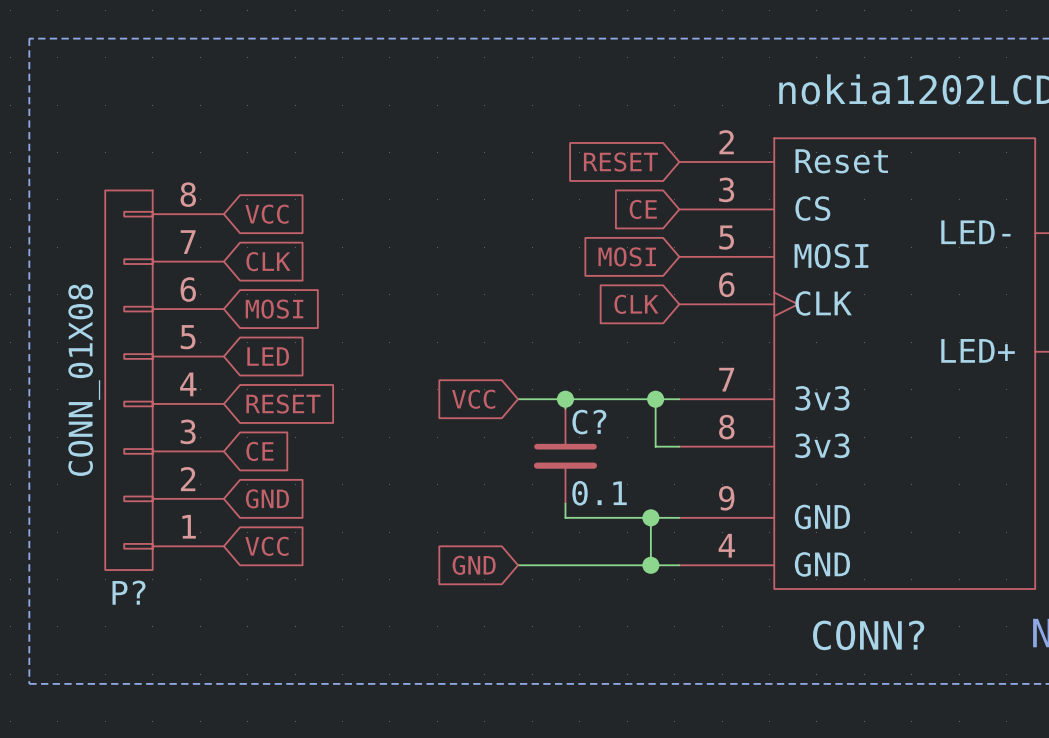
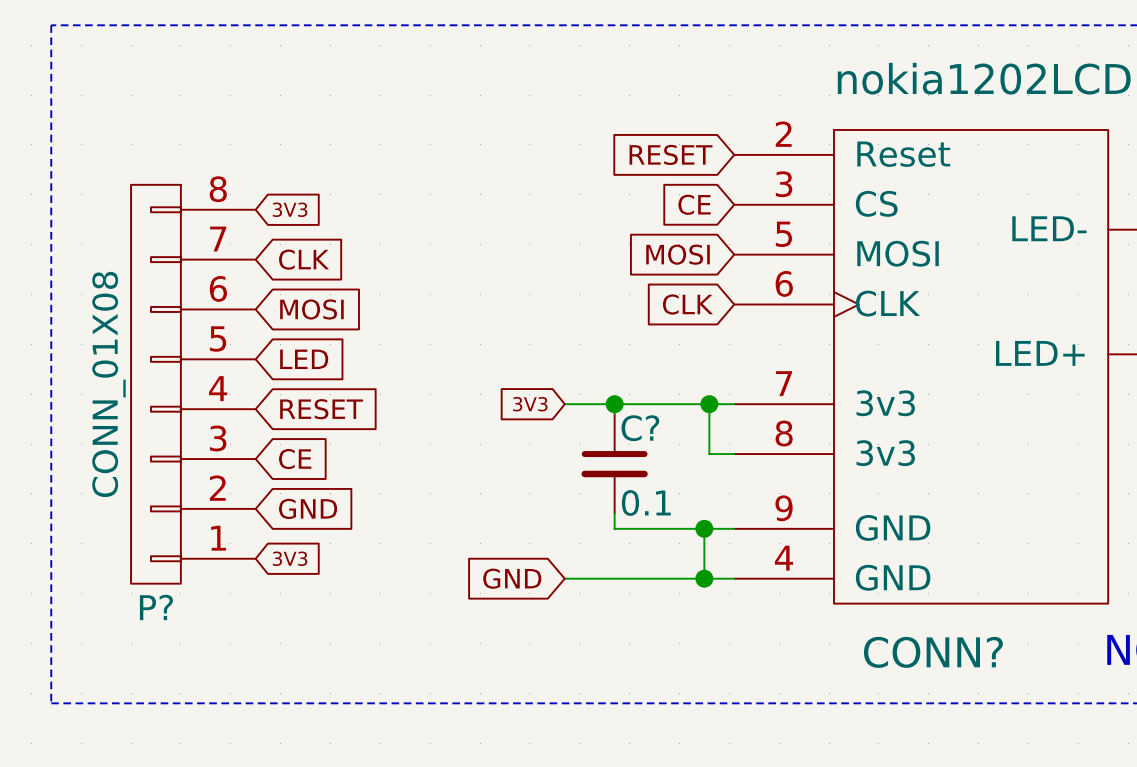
global label: VCC (266, 214) -> 3V3 (290, 209)
global label: VCC (473, 399) -> 3V3 (530, 404)
global label: VCC (266, 546) -> 3V3 (290, 558)

